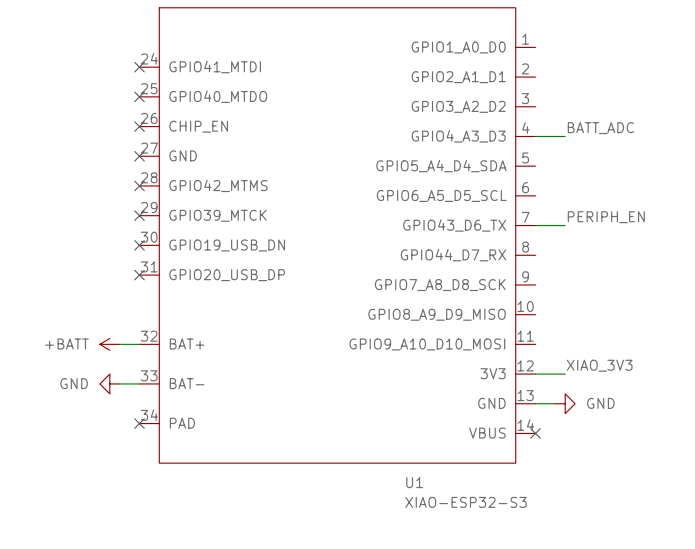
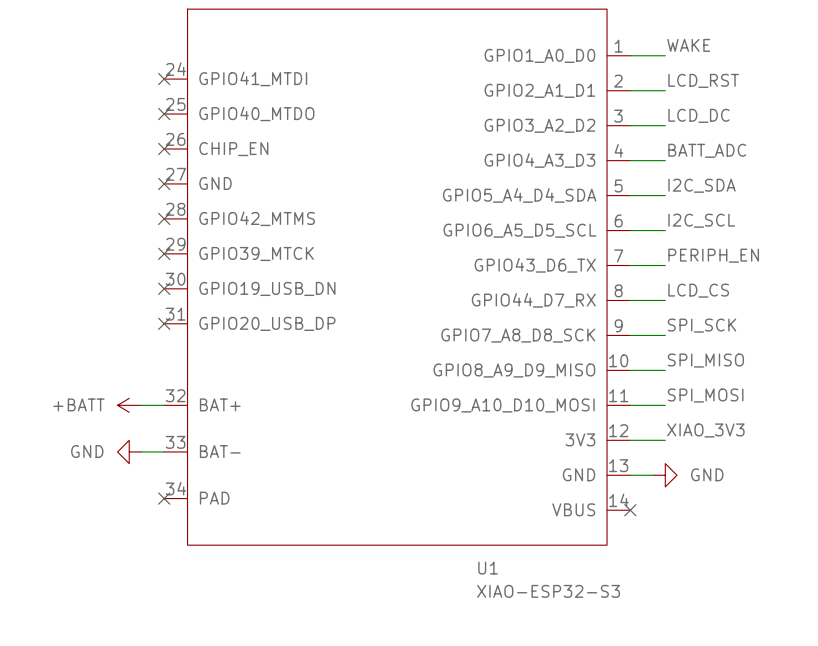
label: none -> WAKE (688, 45)
wire: none -> (630, 55) (665, 55)
label: none -> LCD_RST (703, 80)
wire: none -> (630, 90) (665, 90)
label: none -> LCD_DC (698, 115)
wire: none -> (630, 125) (665, 125)
label: none -> I2C_SDA (702, 185)
wire: none -> (630, 195) (665, 195)
label: none -> I2C_SCL (701, 220)
wire: none -> (630, 230) (665, 230)
label: none -> LCD_CS (698, 290)
wire: none -> (630, 300) (665, 300)
label: none -> SPI_SCK (702, 325)
wire: none -> (630, 335) (665, 335)
label: none -> SPI_MISO (705, 360)
wire: none -> (630, 370) (665, 370)
label: none -> SPI_MOSI (705, 395)
wire: none -> (630, 405) (665, 405)

